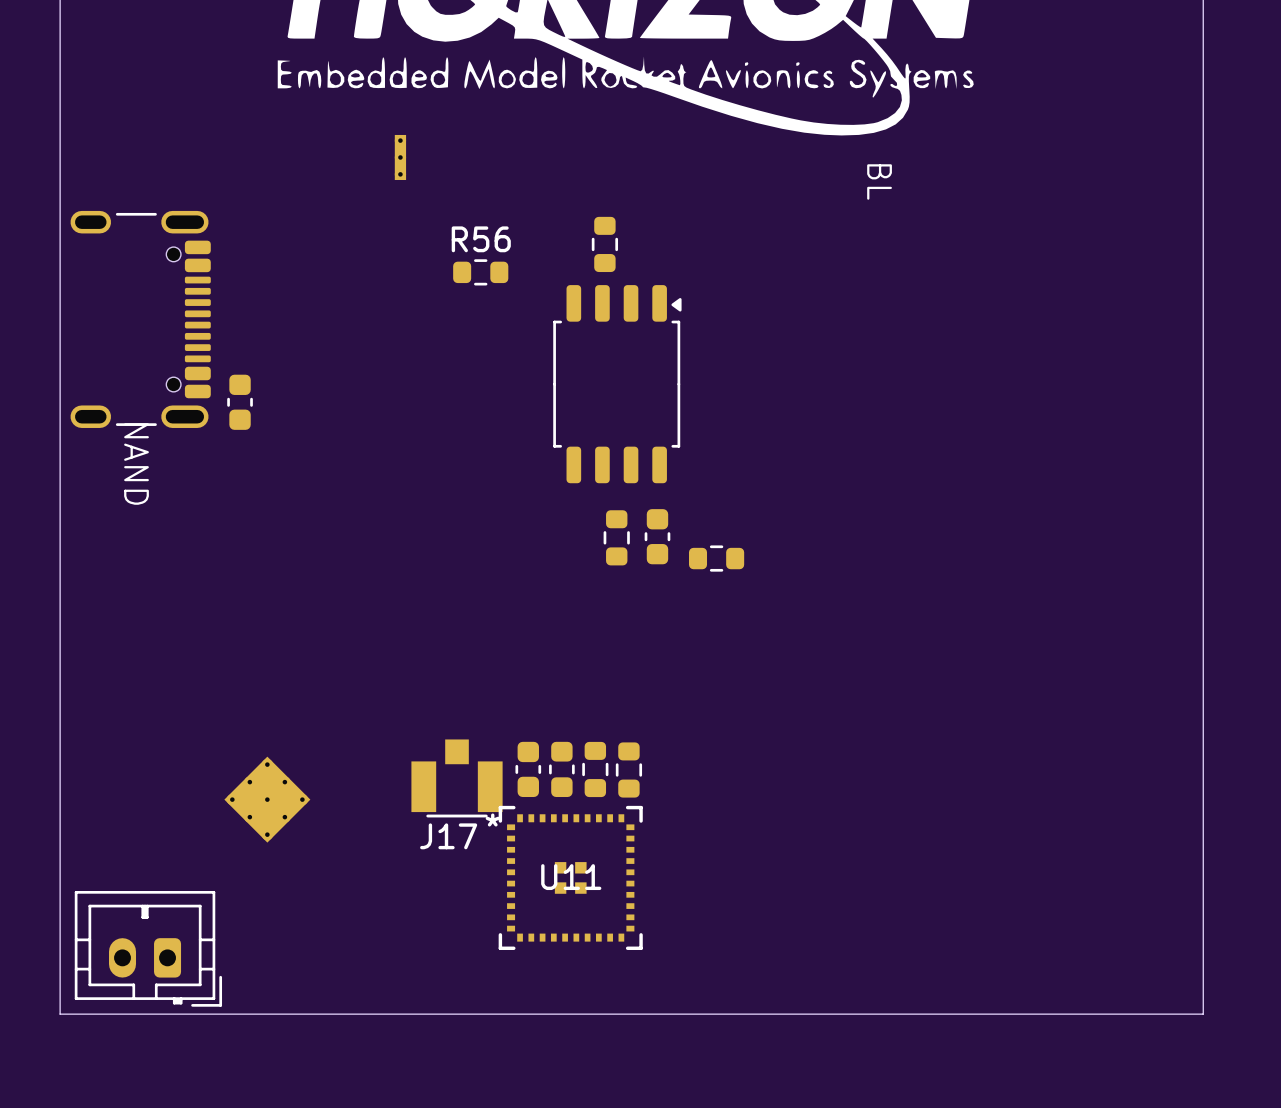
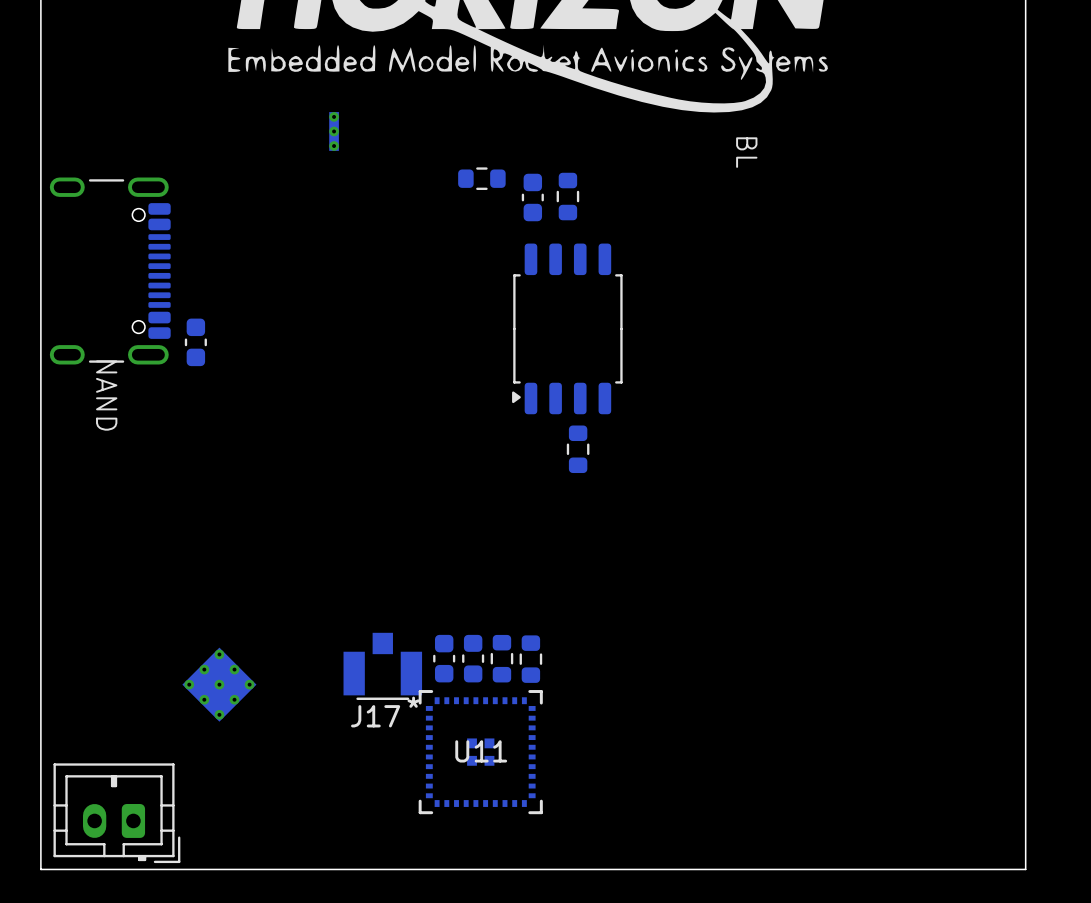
part: none -> (481, 178)
part: none -> (567, 196)
part: (604, 244) -> none
R56: (480, 272) -> none
part rotation: 0° (617, 384) -> 180° (567, 328)
part: none -> (578, 449)
part position: (657, 536) -> (532, 197)
part: (616, 537) -> none
part: (716, 558) -> none

